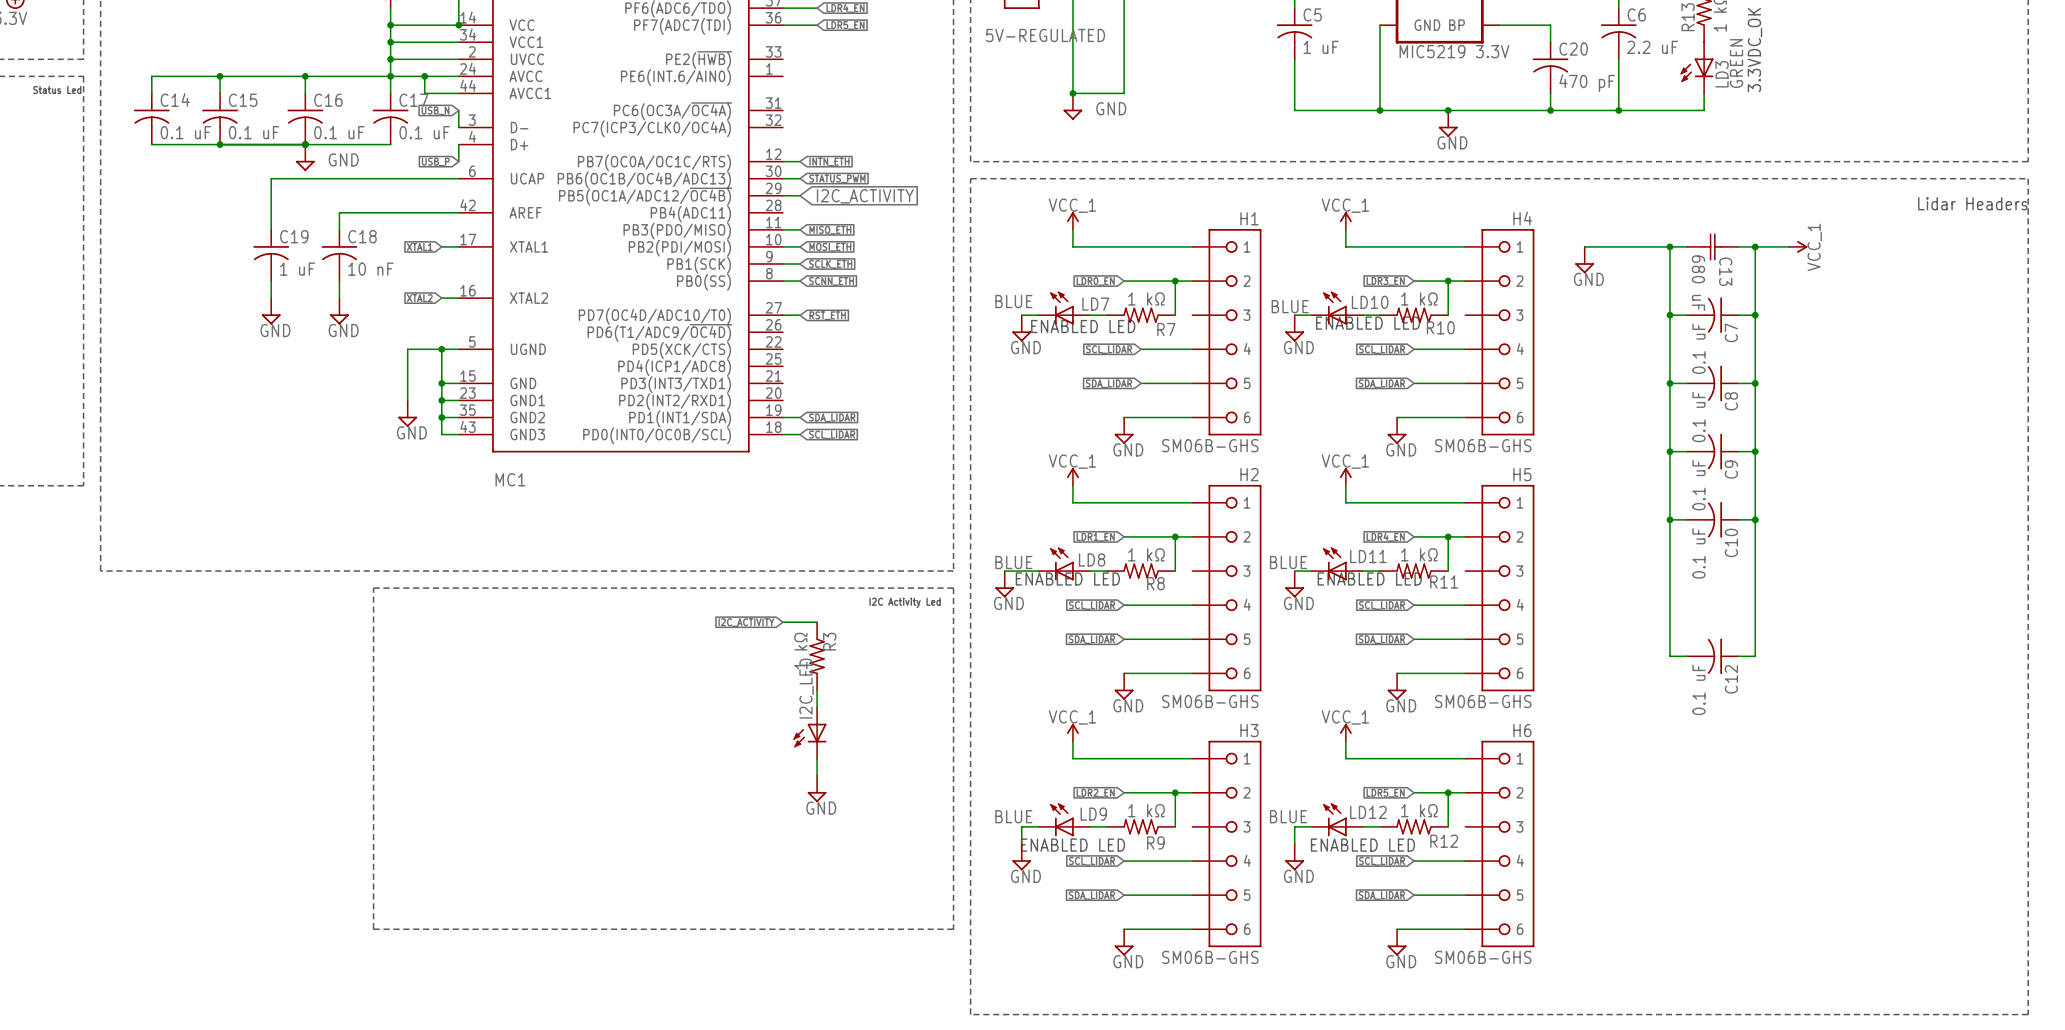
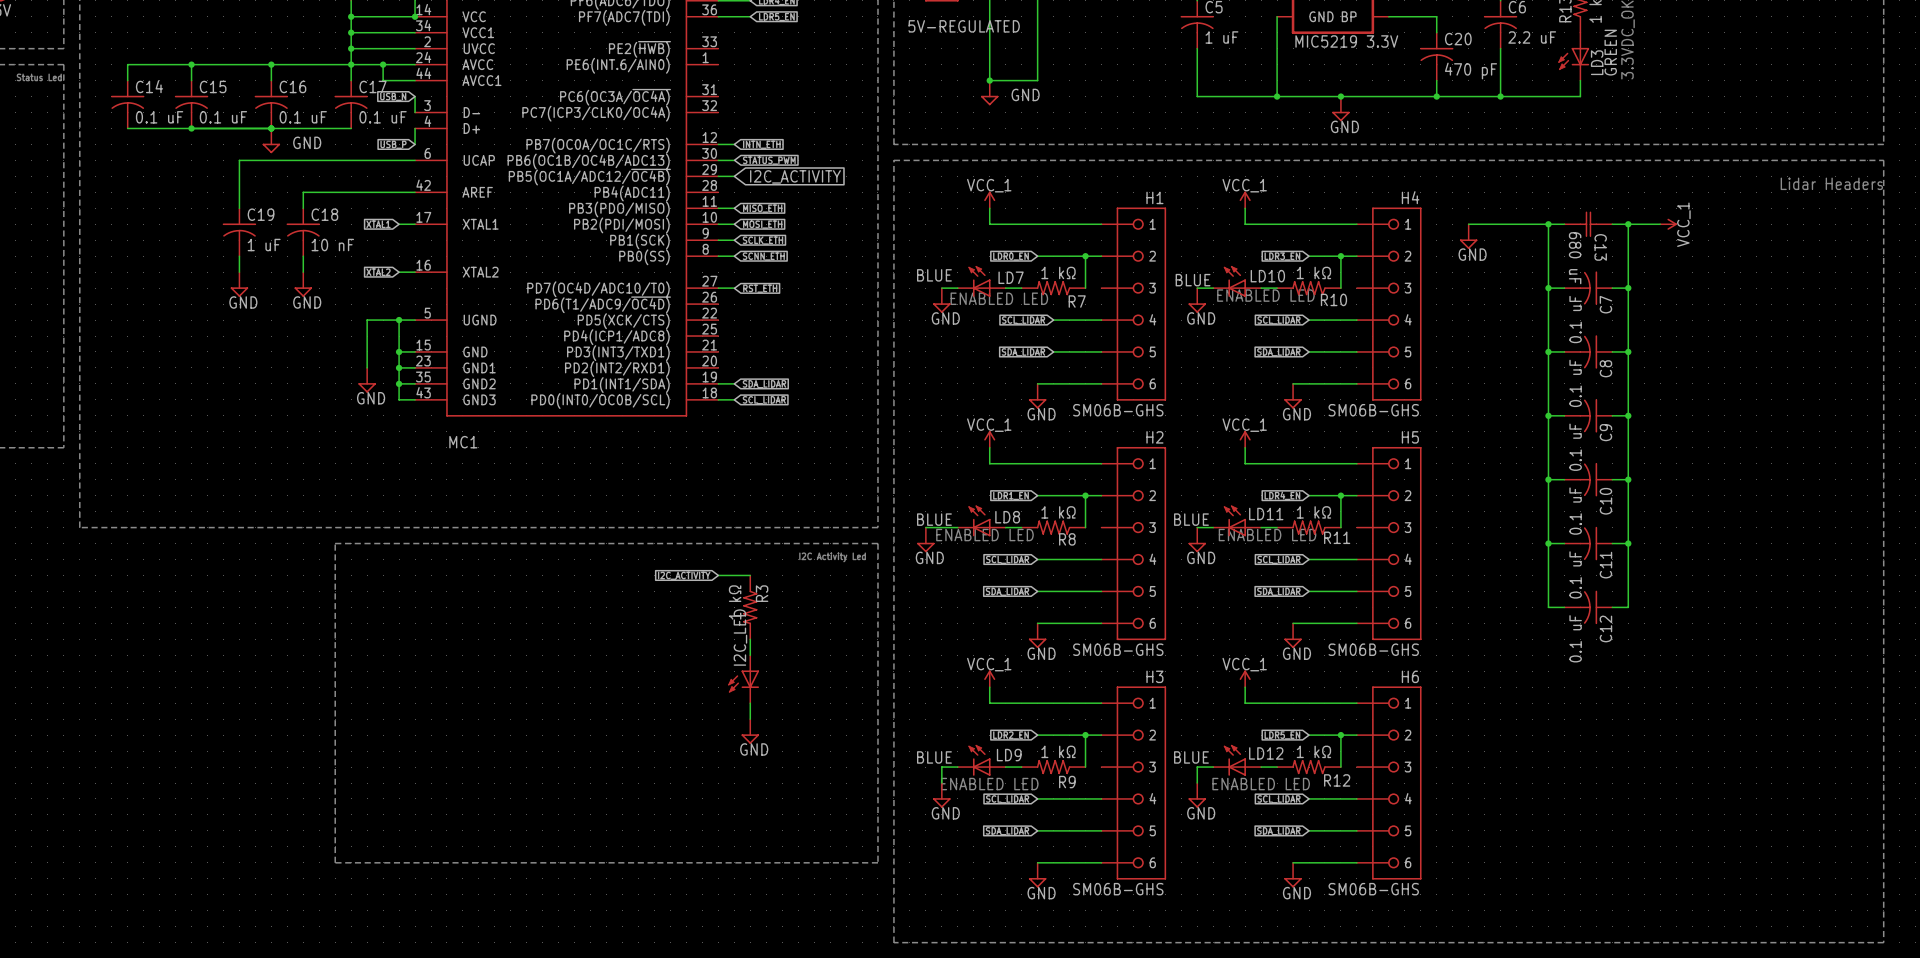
wire: none -> (1548, 543) (1564, 543)
junction: none -> (1548, 543)
C11: none -> 0.1 uF (1588, 543)
wire: none -> (1612, 543) (1628, 543)
junction: none -> (1628, 543)

